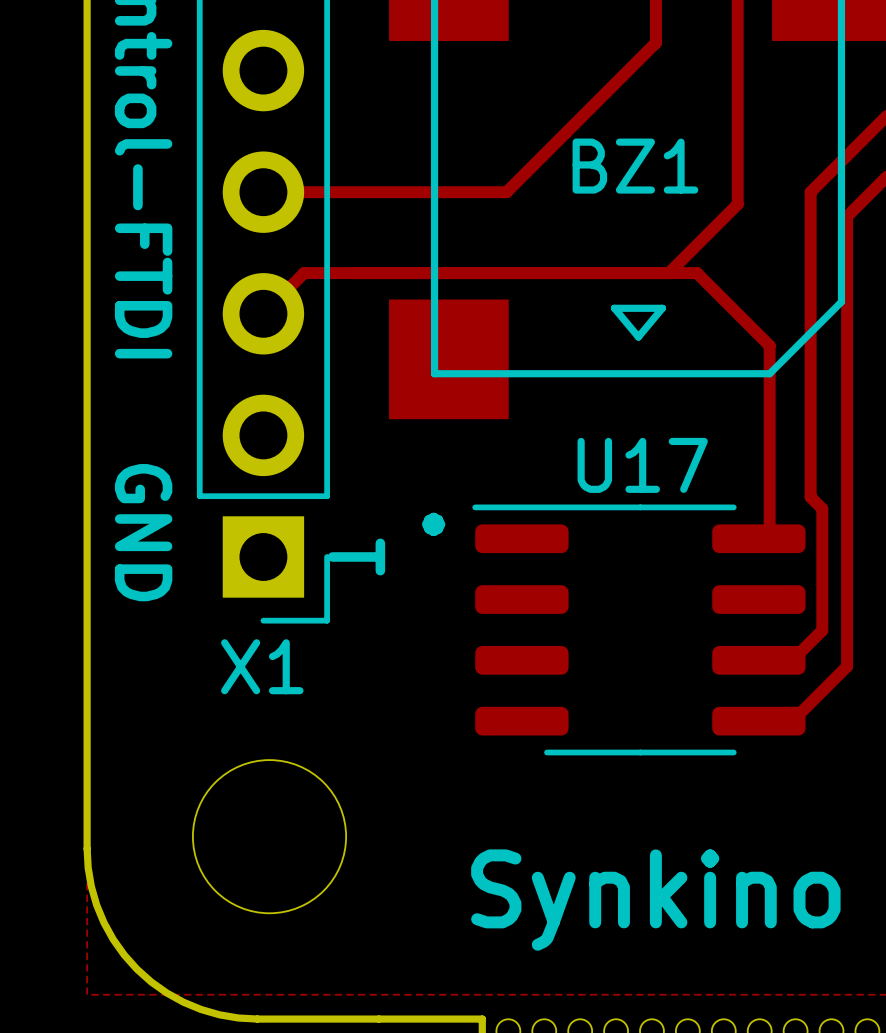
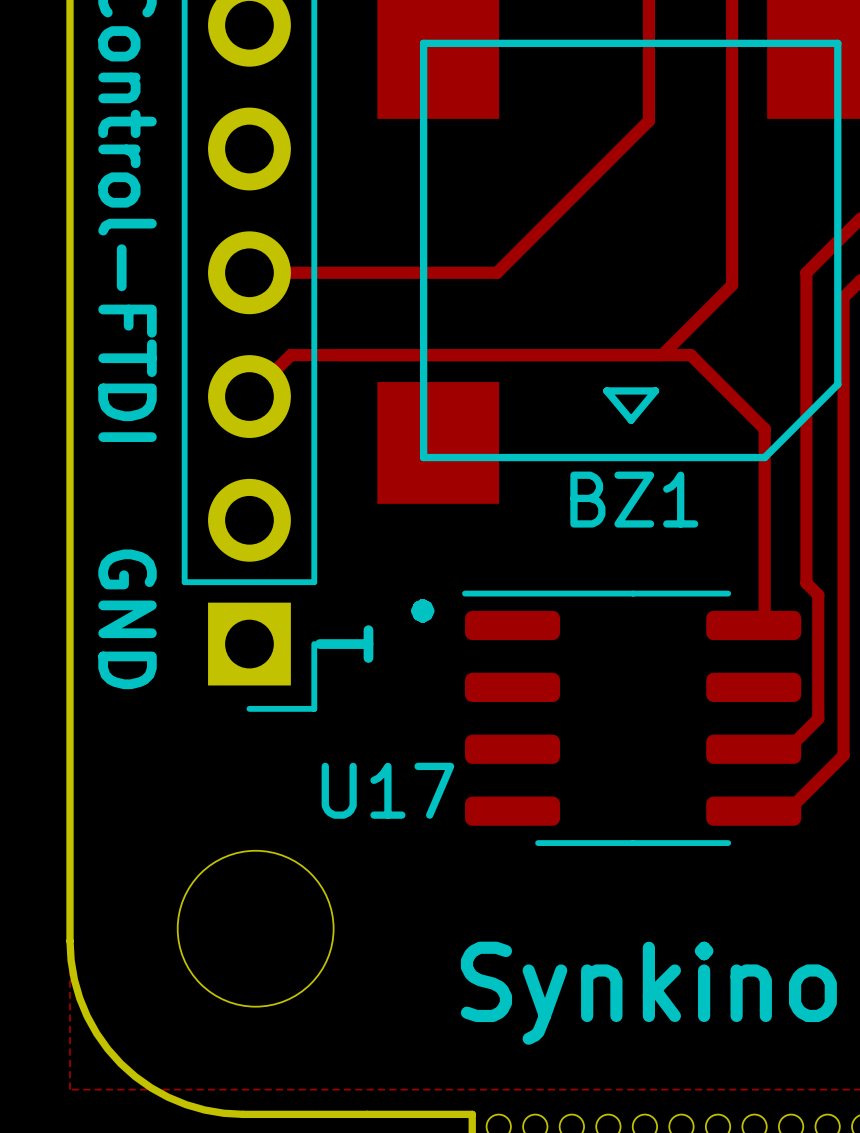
BZ1 name position: BZ1 (635, 166) -> BZ1 (634, 499)
U17 name position: U17 (642, 465) -> U17 (387, 790)
X1 name: X1 (262, 666) -> none

